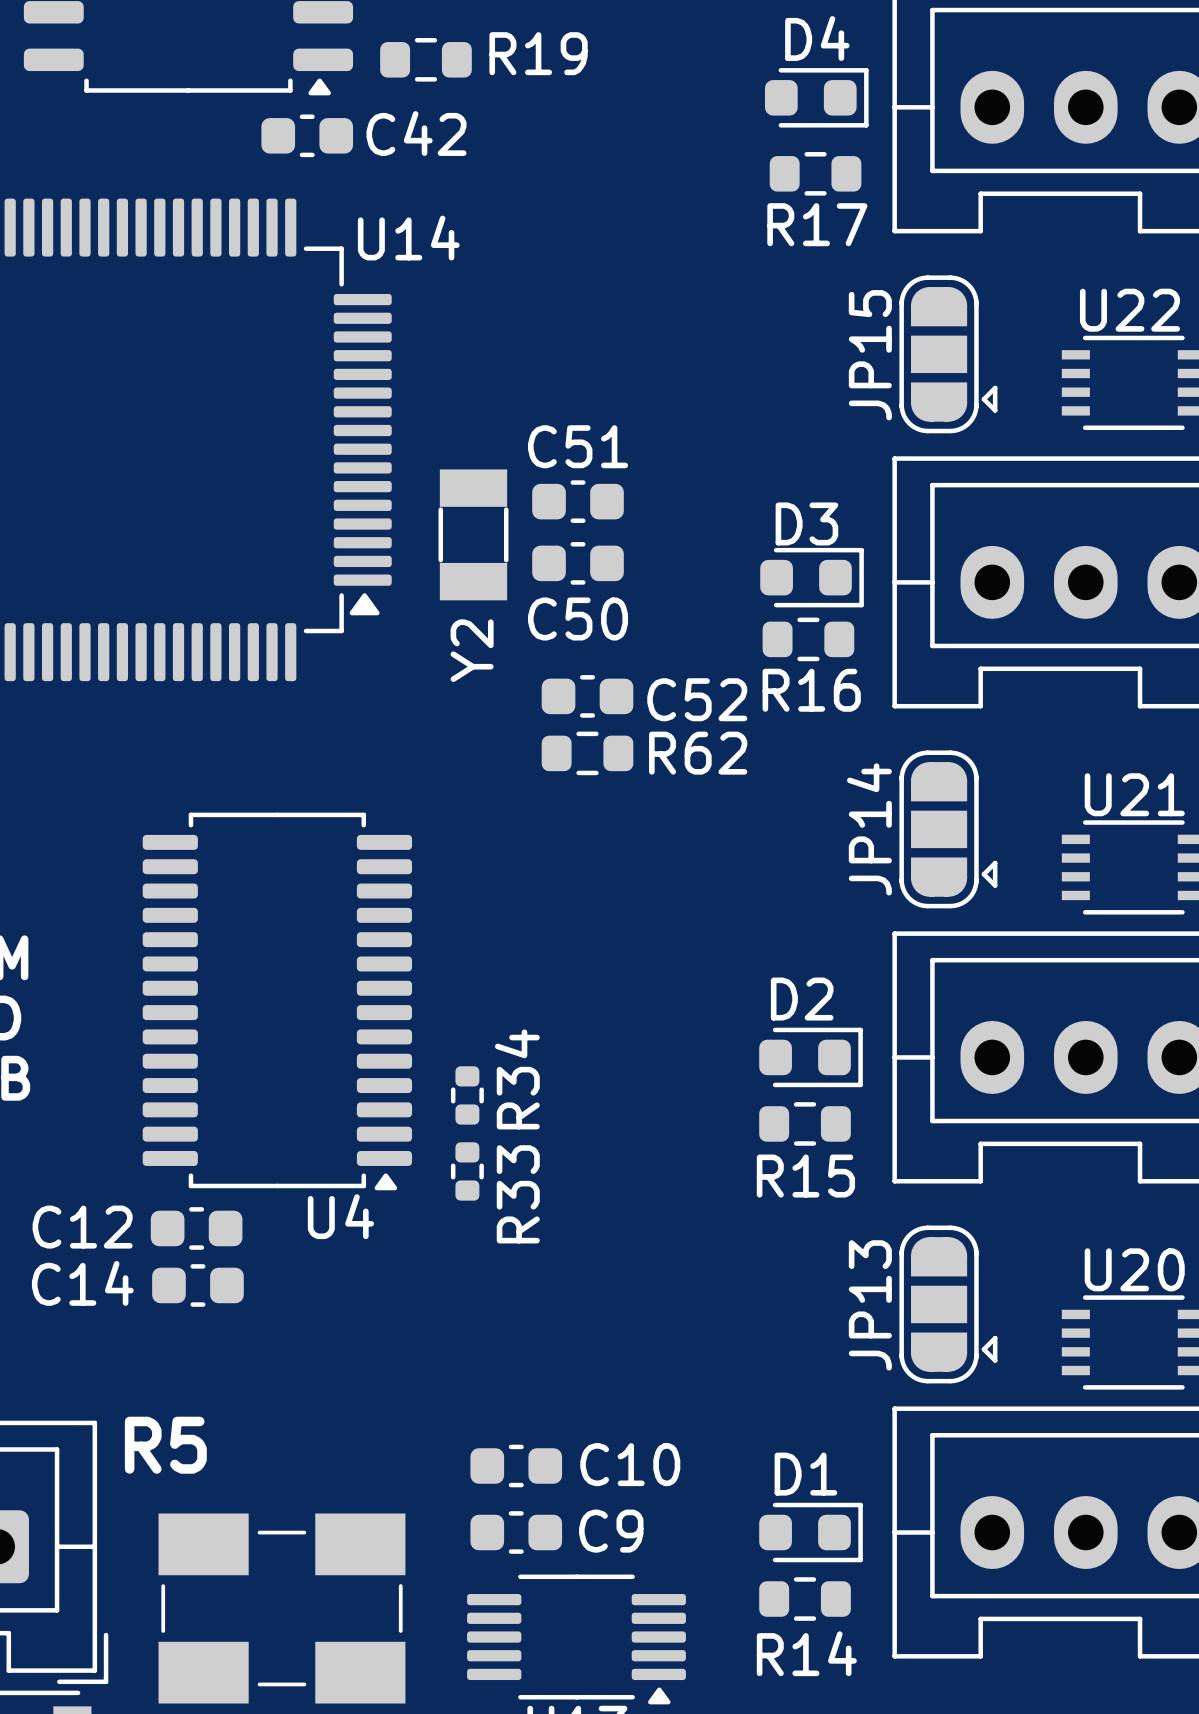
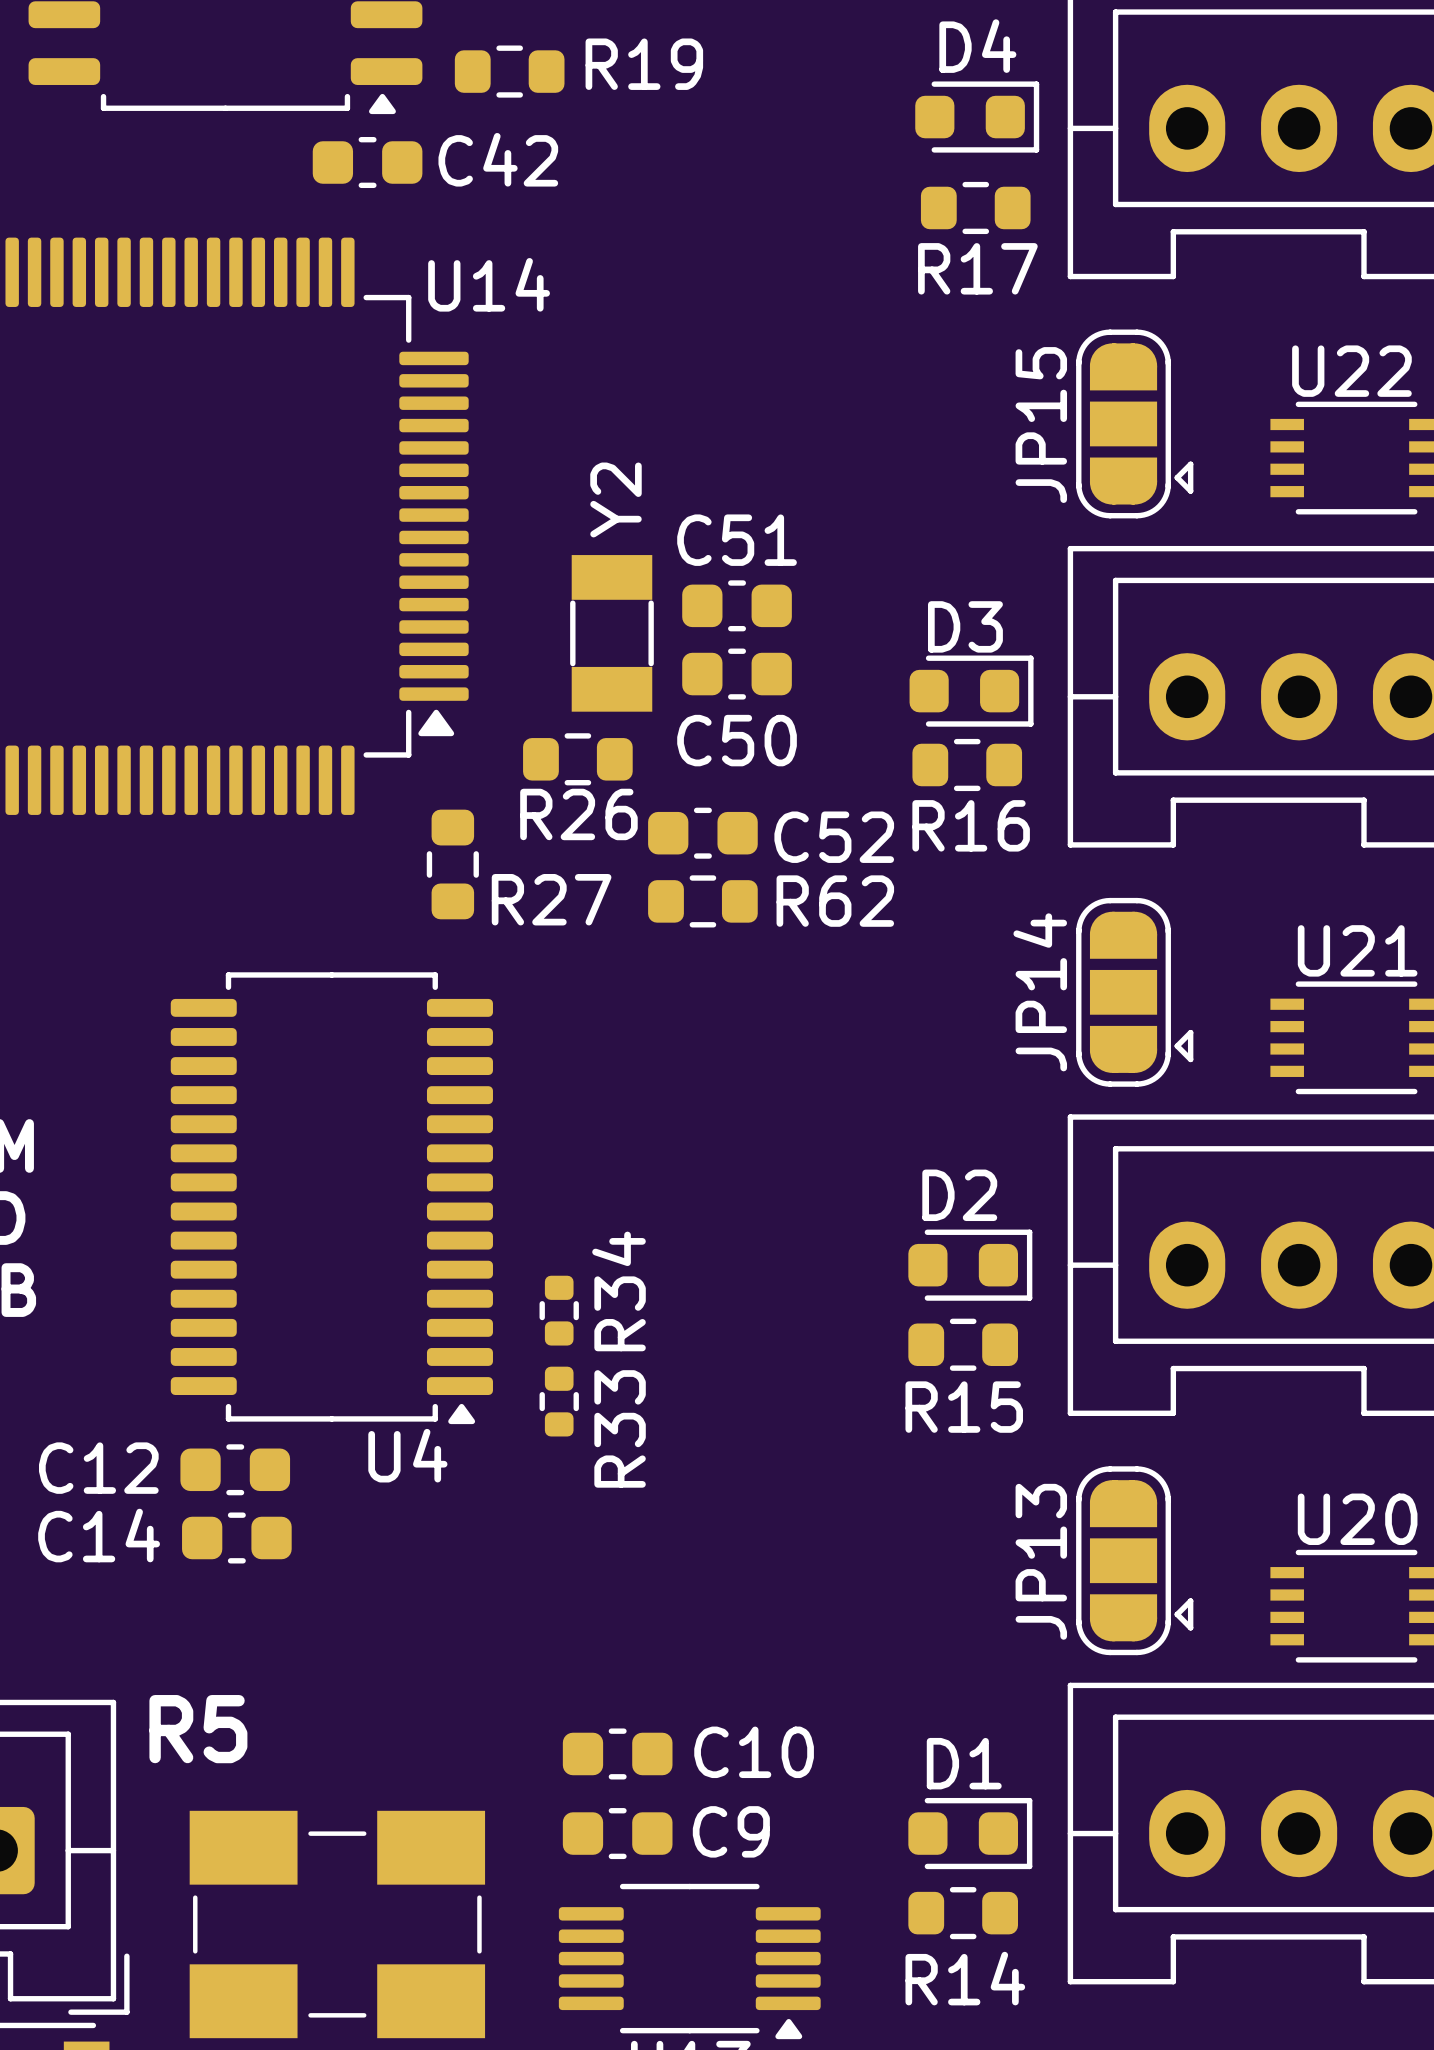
C51 position: (578, 501) -> (737, 605)
Y2 position: (473, 534) -> (611, 633)
C50 position: (578, 563) -> (737, 674)
R26: none -> (577, 759)
Y2 name position: Y2 (472, 650) -> Y2 (615, 499)
R27: none -> (452, 864)

